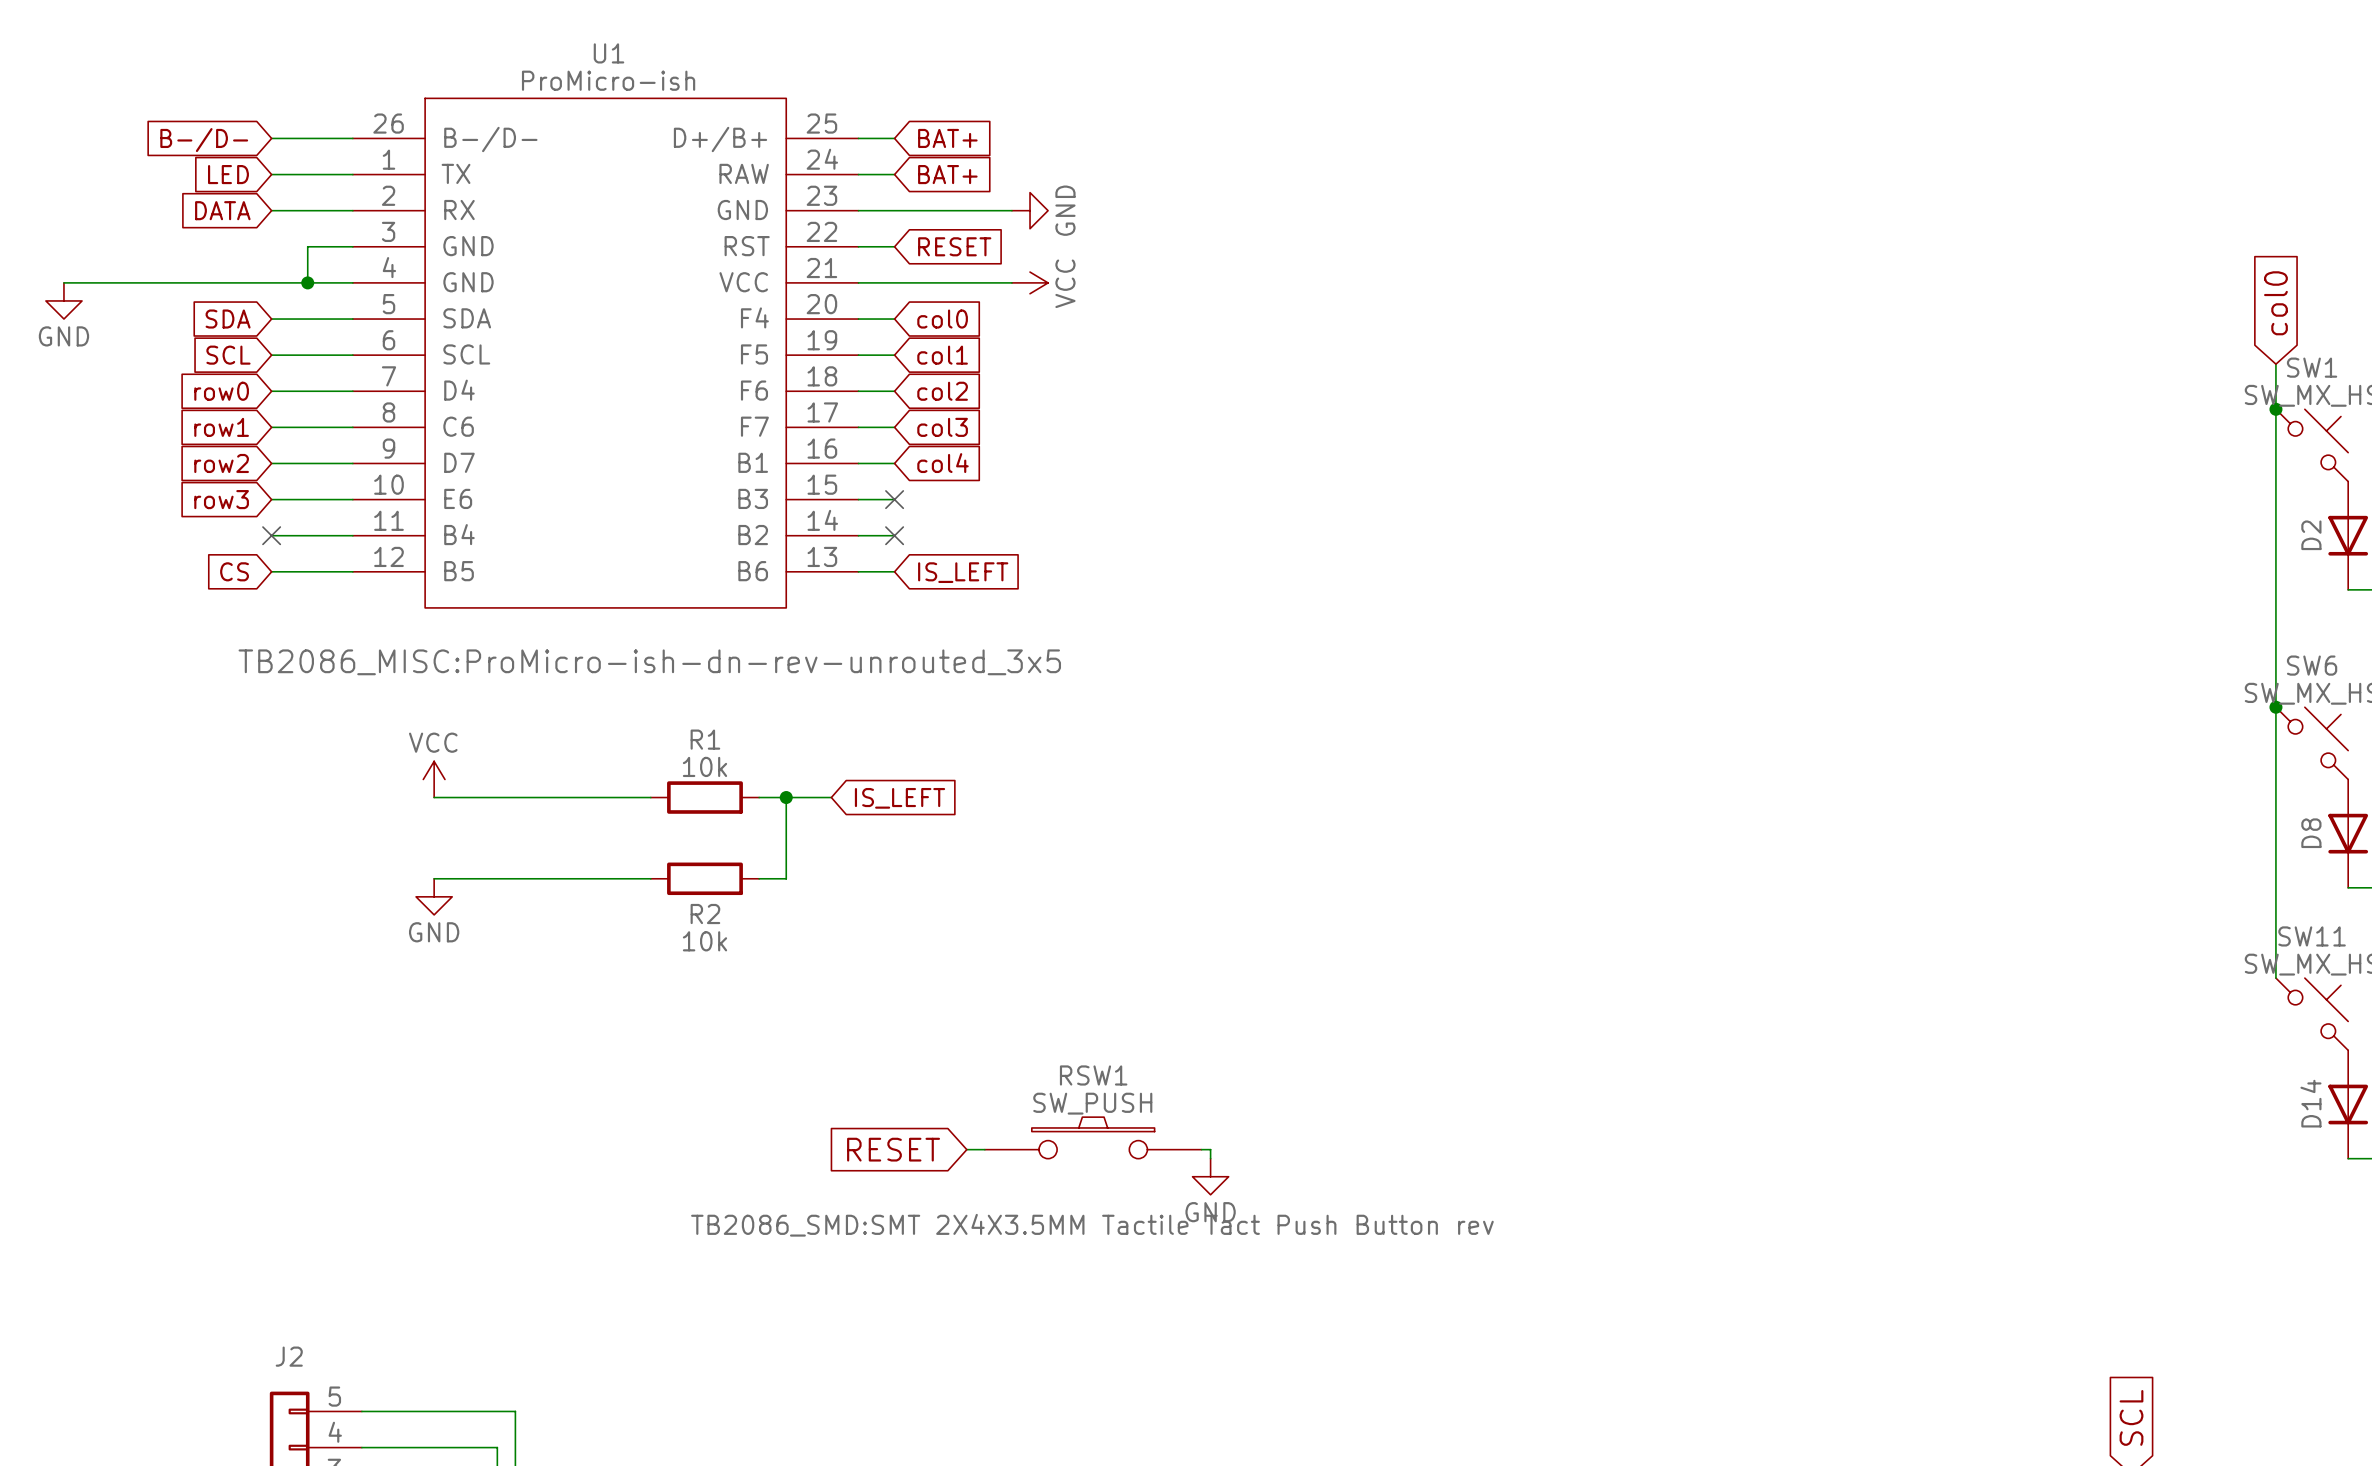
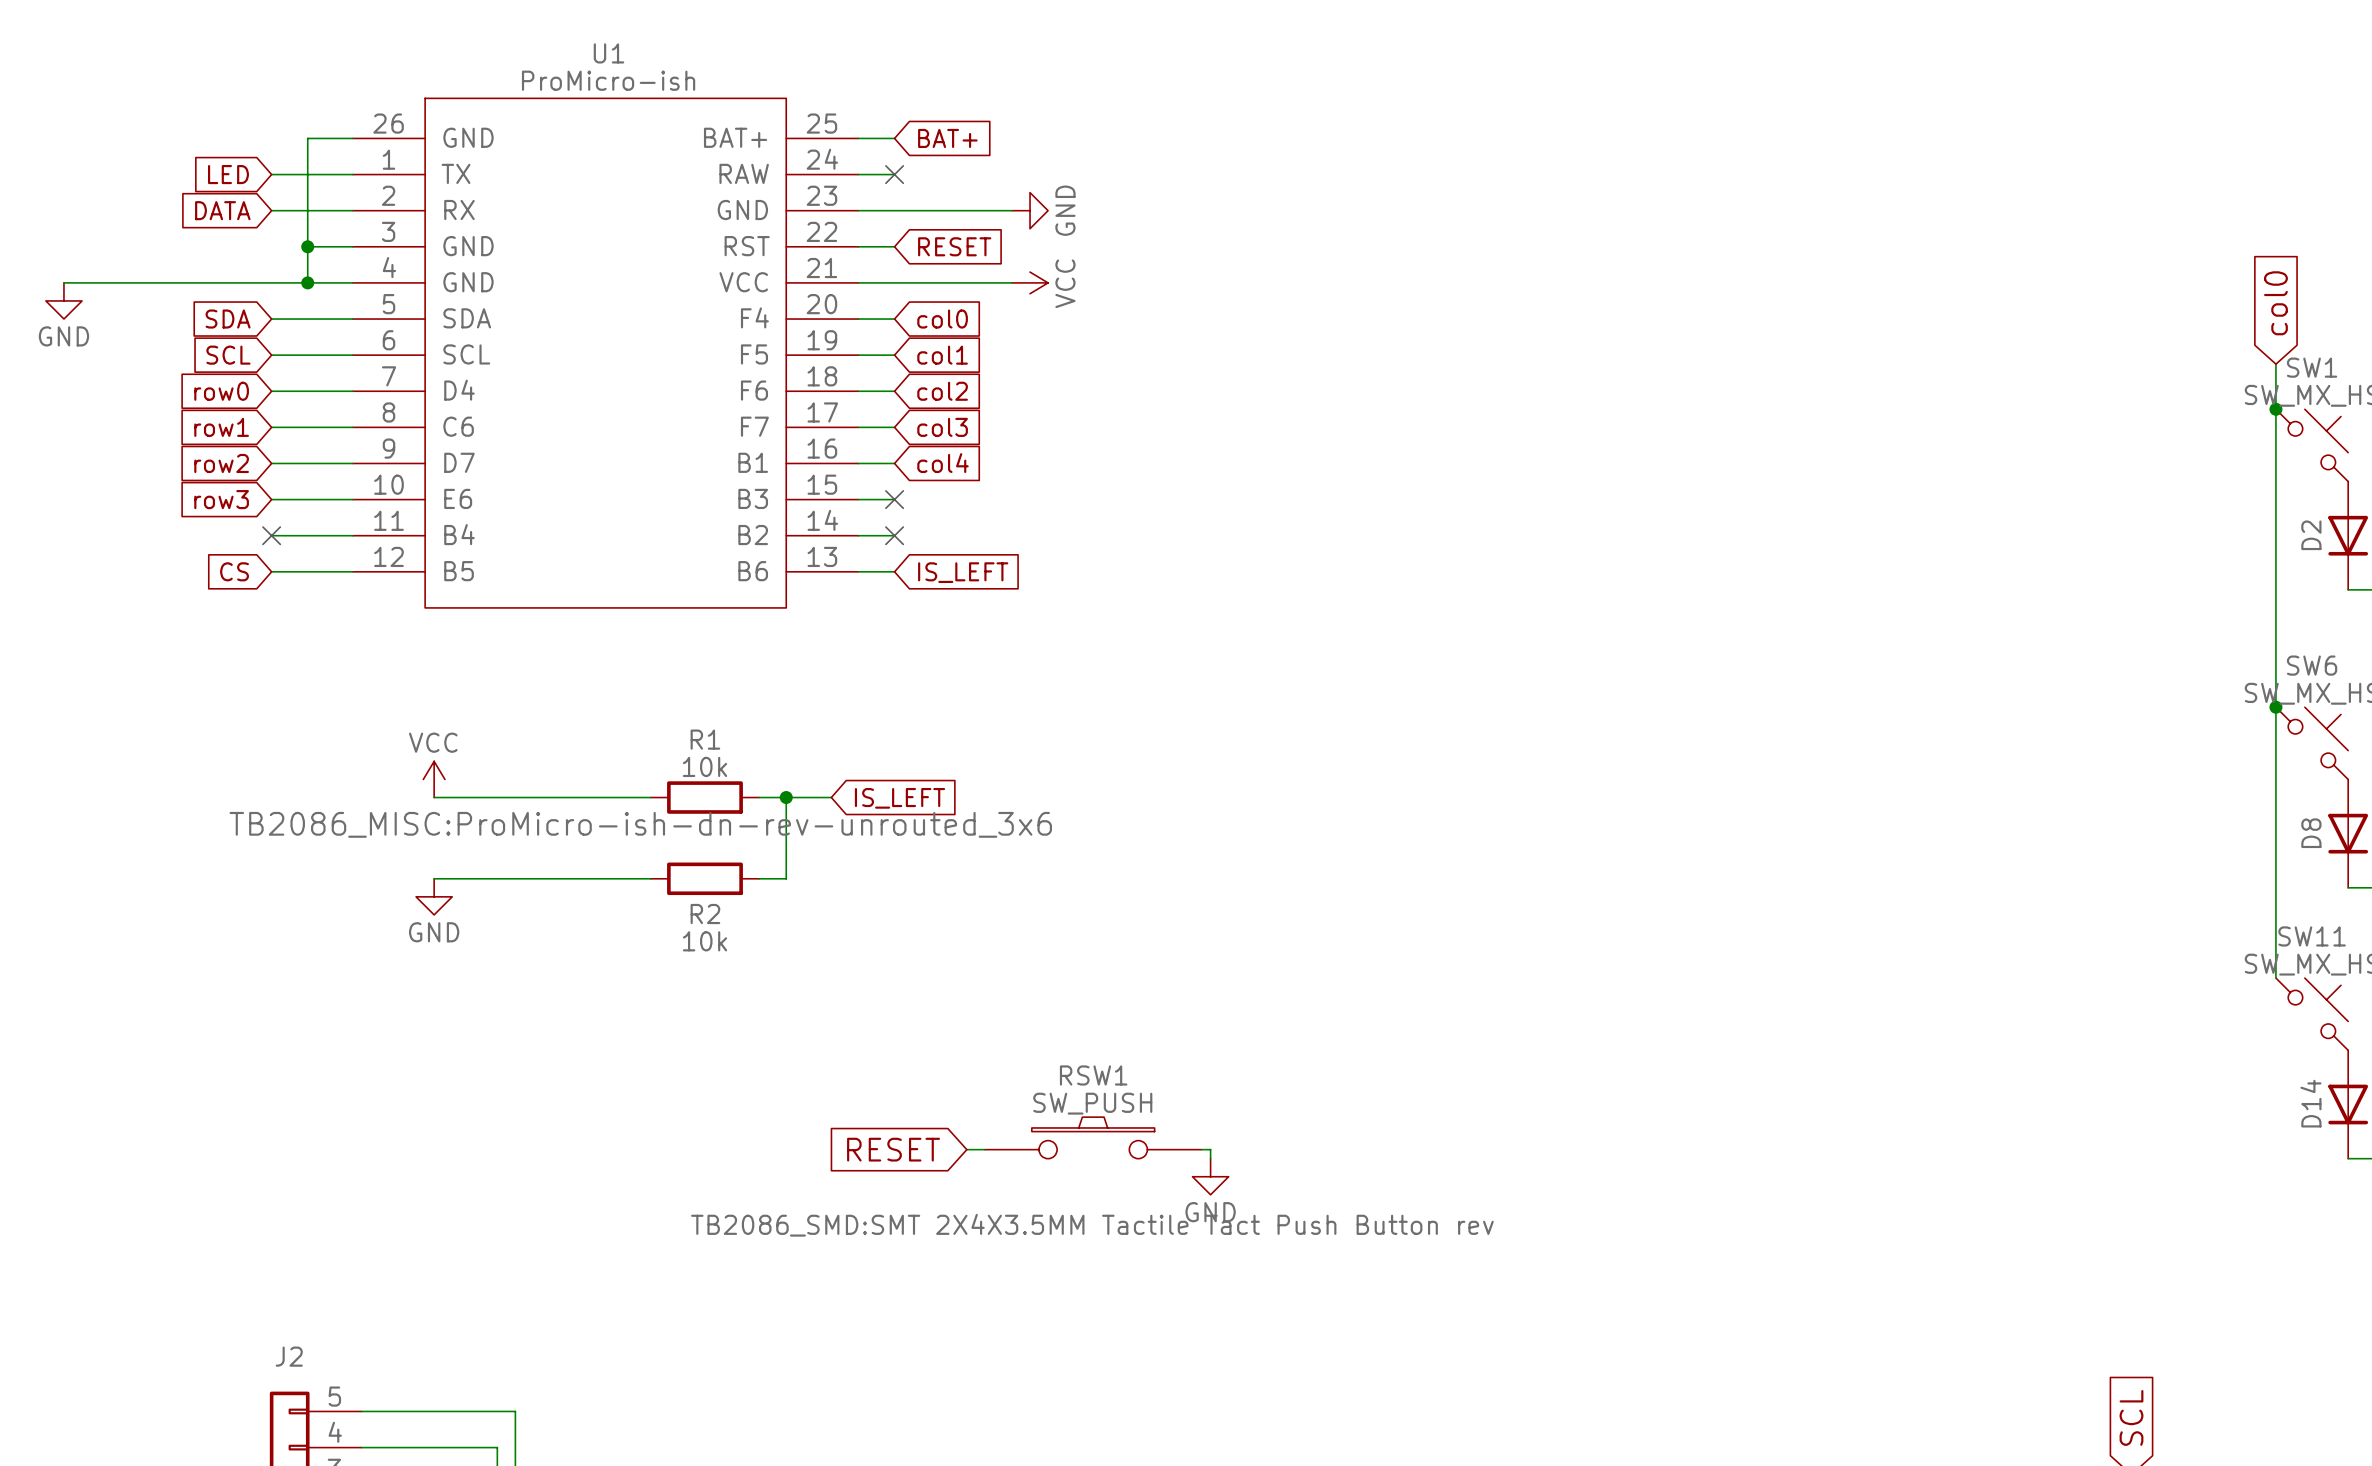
wire: (271, 138) (307, 138) -> (307, 246) (307, 138)
U1 pin name: B-/D- (490, 139) -> GND (468, 137)
U1 pin name: D+/B+ (720, 139) -> BAT+ (735, 137)
global label: B-/D- (204, 140) -> none
no-connect mark: none -> (894, 174)
global label: BAT+ (947, 174) -> none
junction: none -> (307, 246)
U1 text: TB2086_MISC:ProMicro-ish-dn-rev-unrouted_3x5 (649, 662) -> TB2086_MISC:ProMicro-ish-dn-rev-unrouted_3x6 (640, 824)

